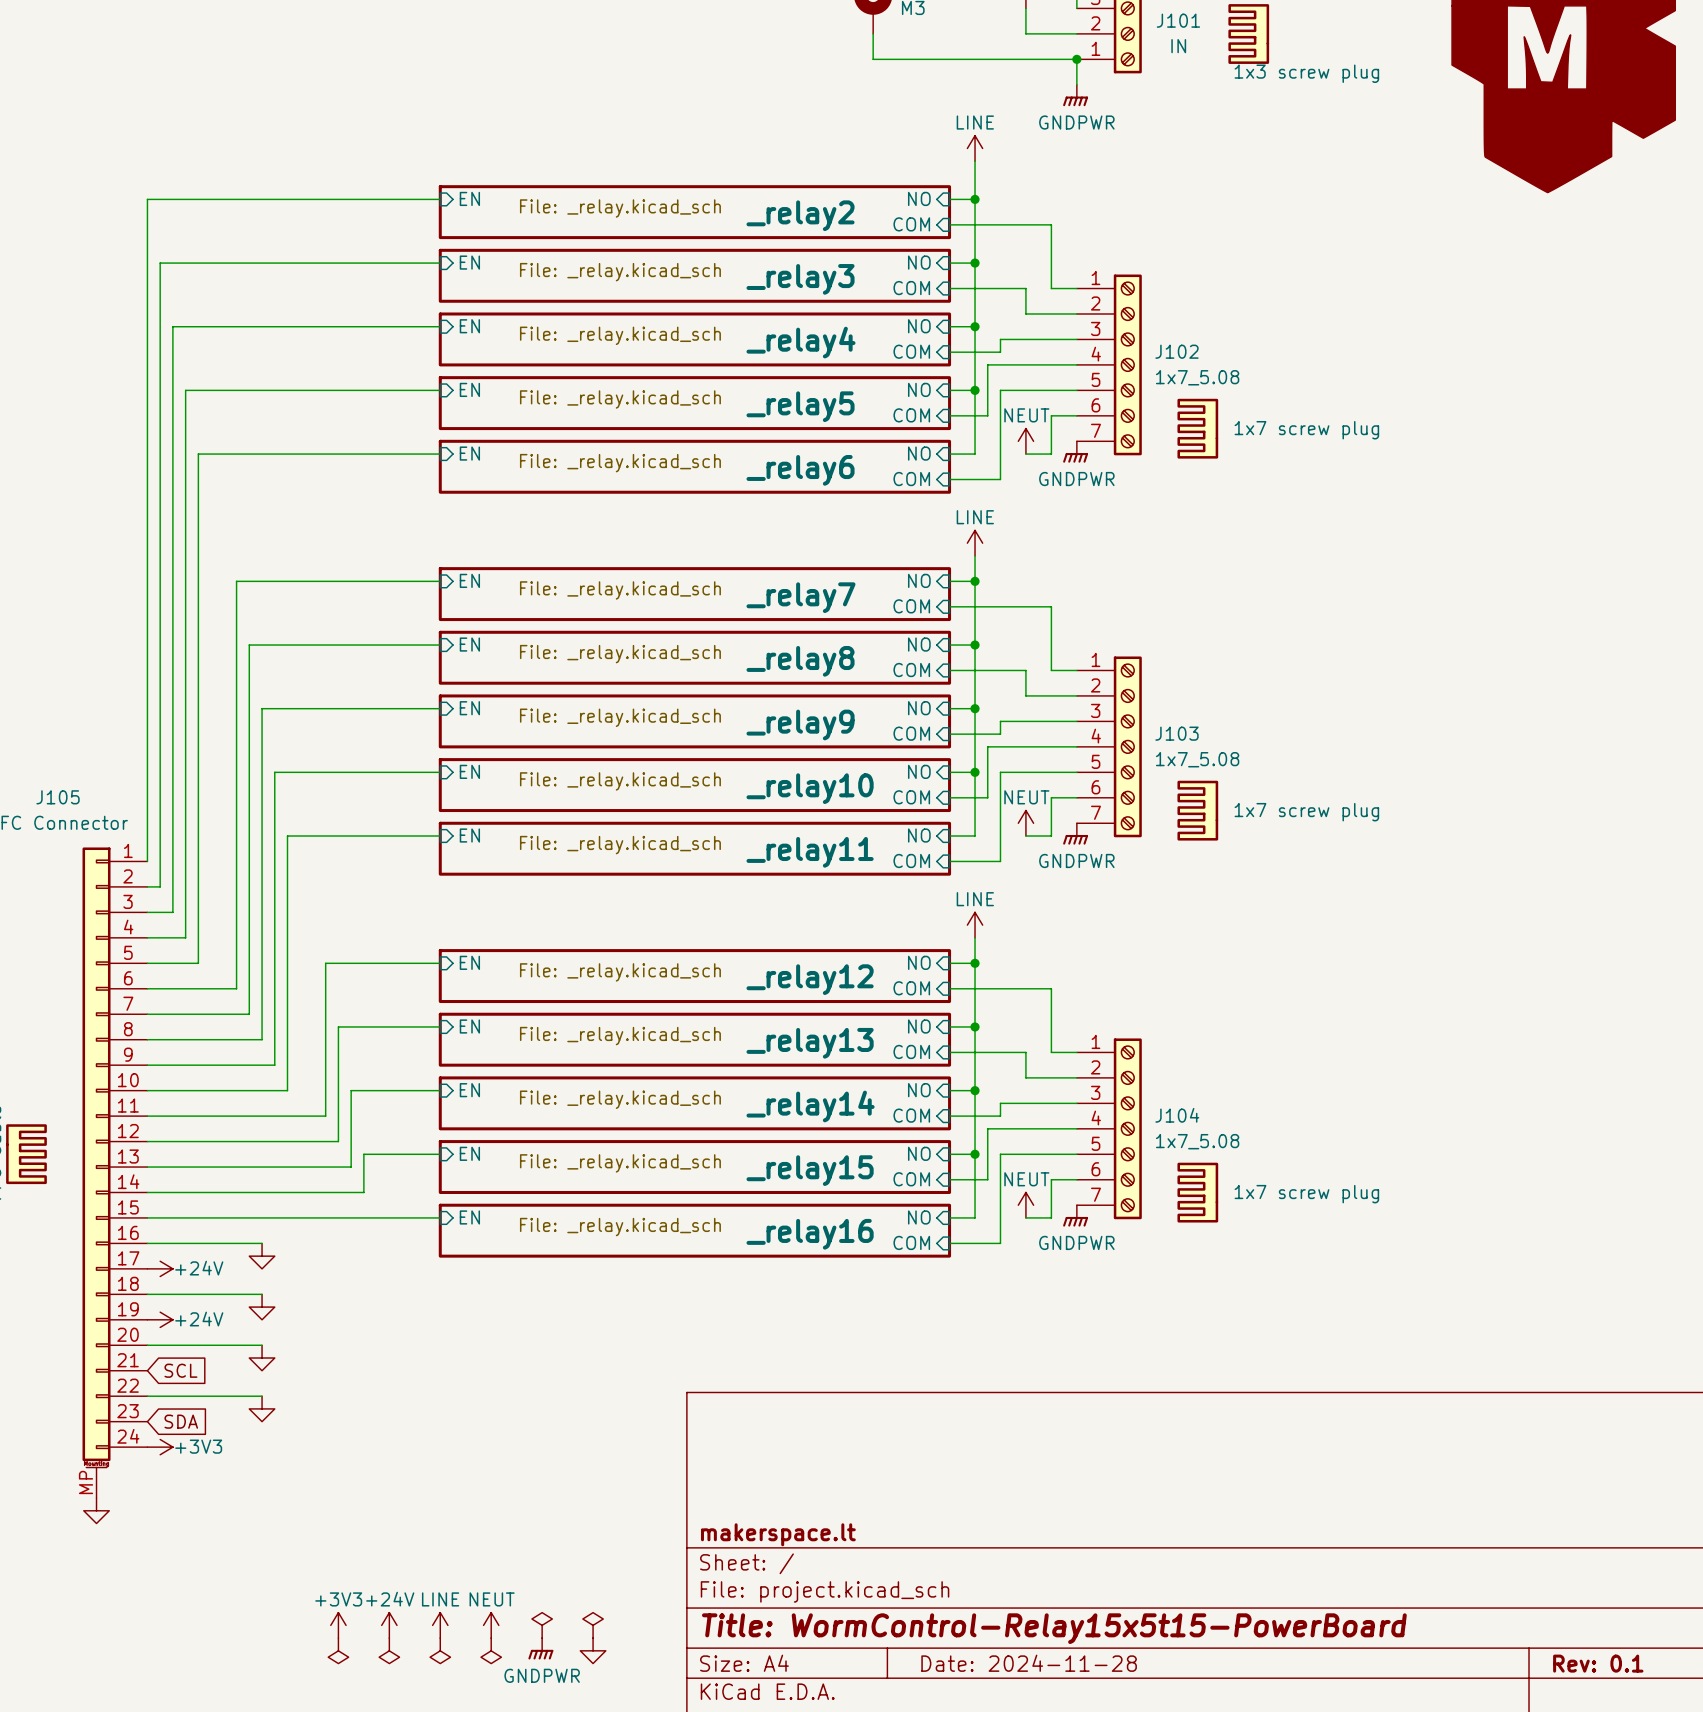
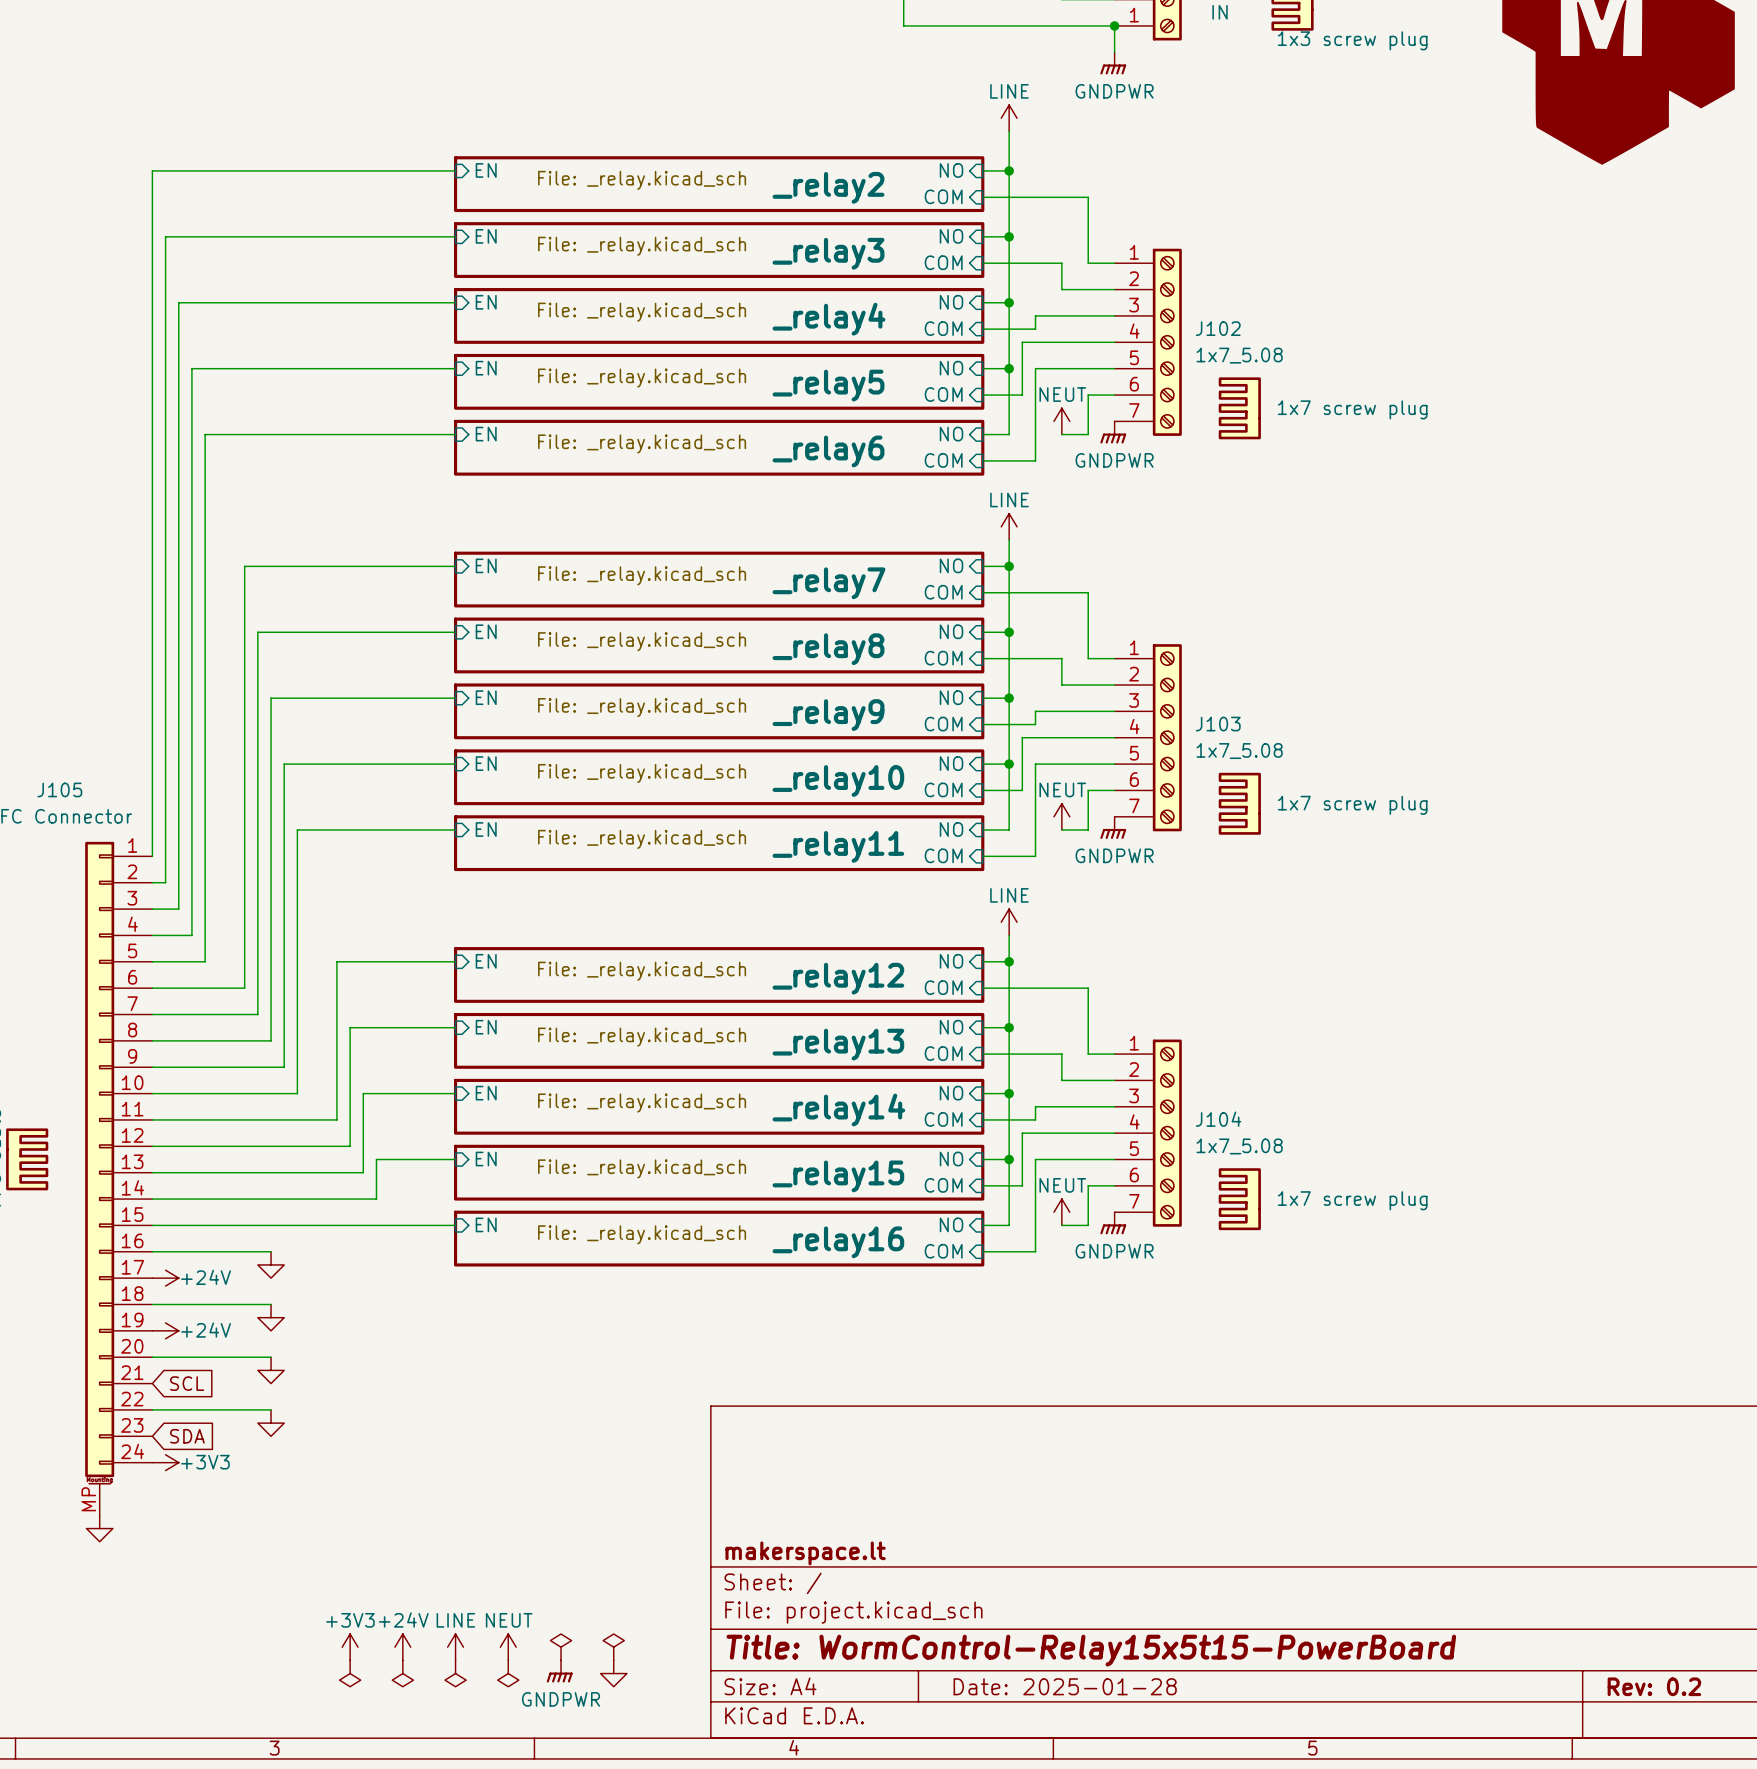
title block: Date: 2024-11-28 (1029, 1663) -> Date: 2025-01-28 (1065, 1686)
title block: Rev: 0.1 (1598, 1663) -> Rev: 0.2 (1654, 1686)

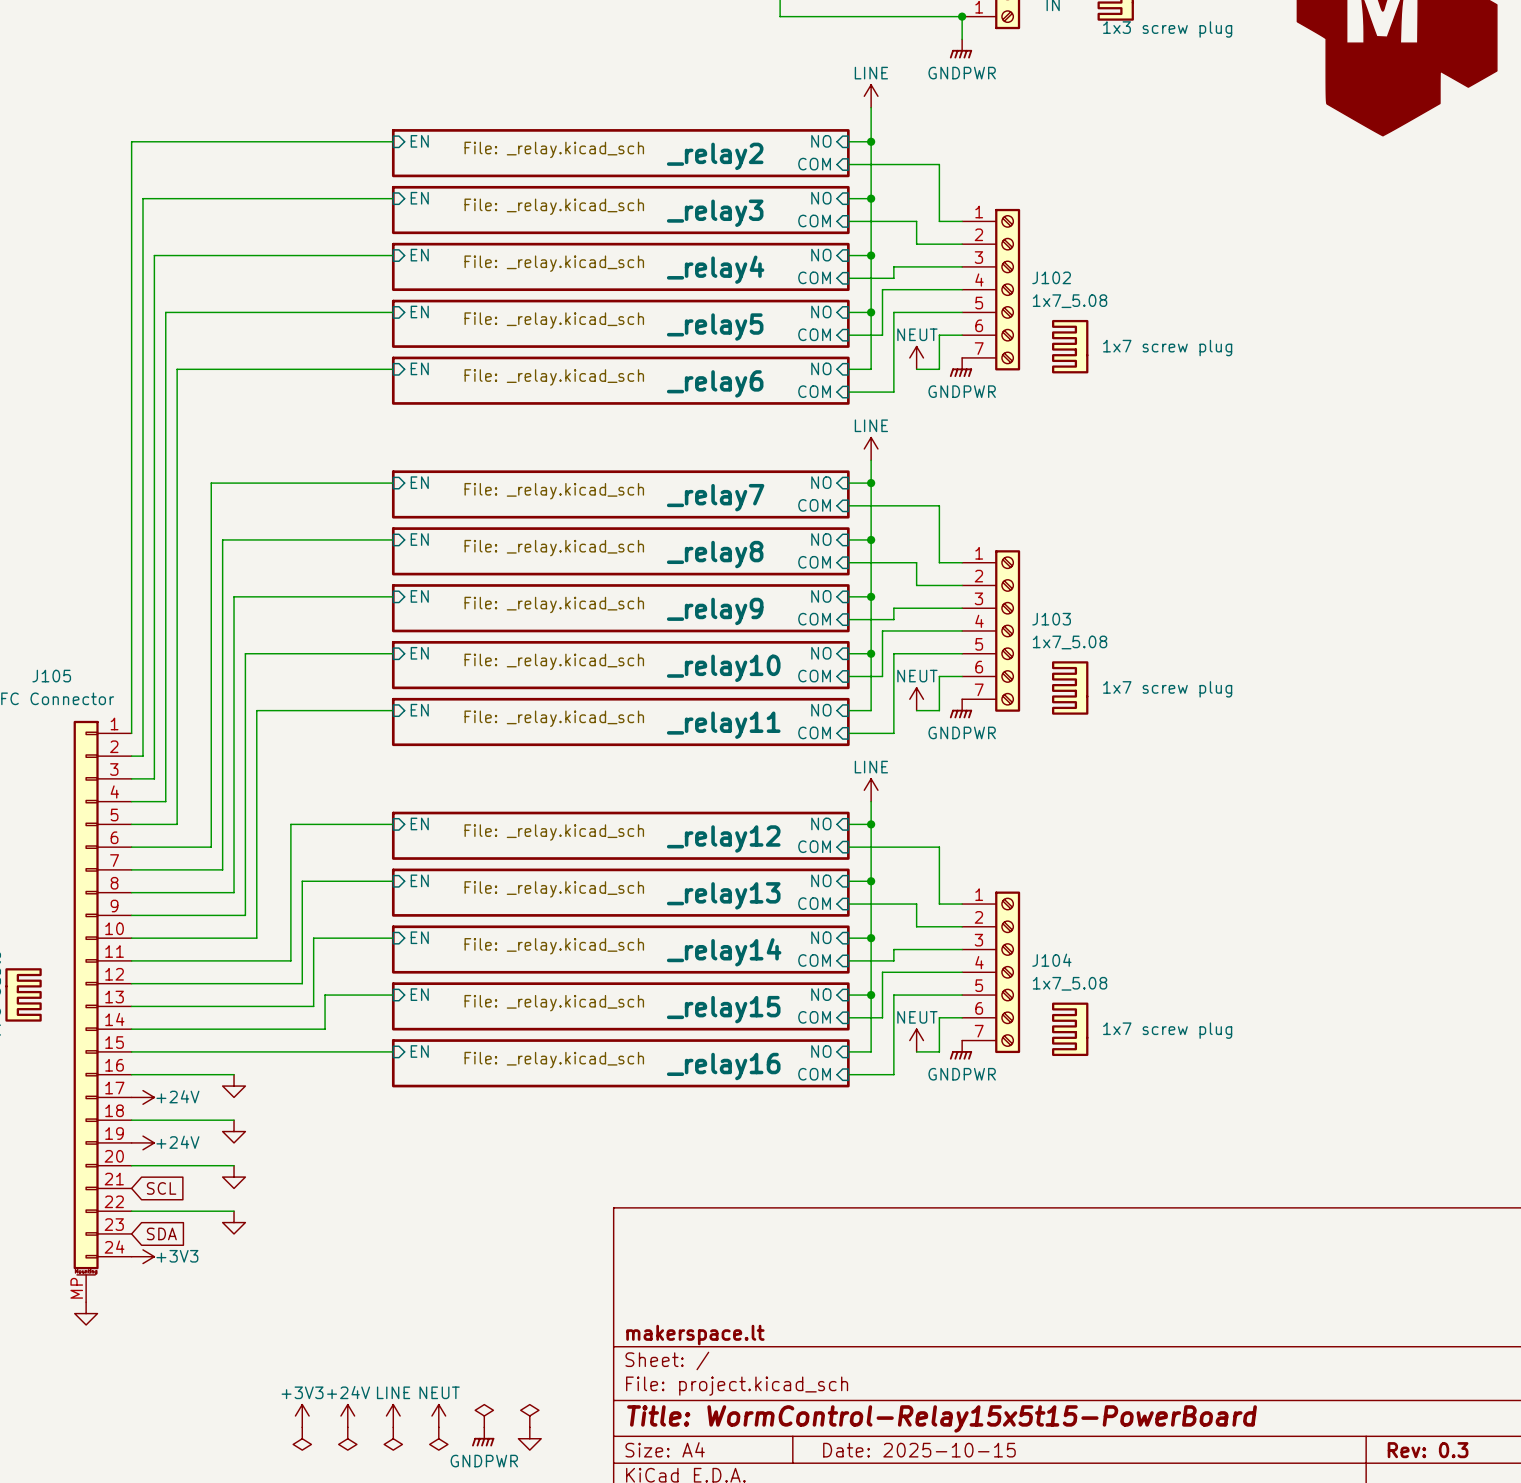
title block: Date: 2025-01-28 (1065, 1686) -> Date: 2025-10-15 (919, 1450)
title block: Rev: 0.2 (1654, 1686) -> Rev: 0.3 (1428, 1450)

